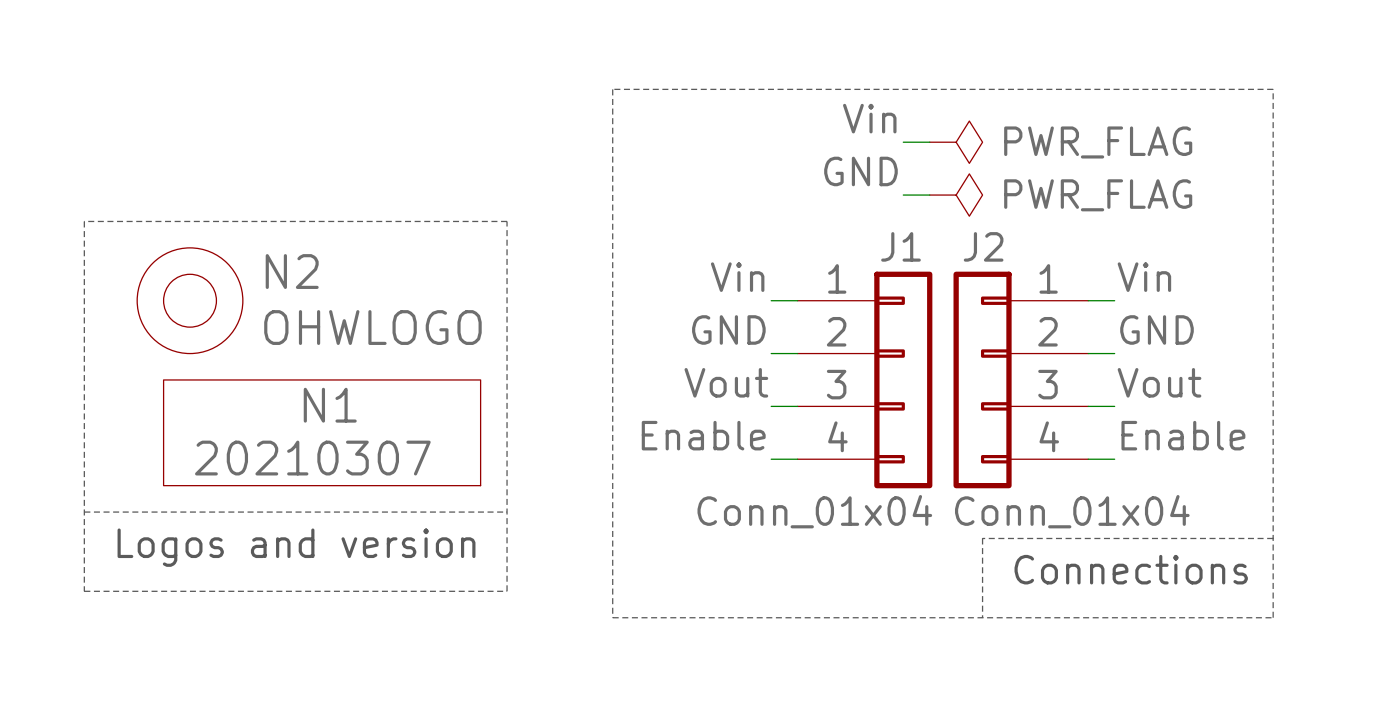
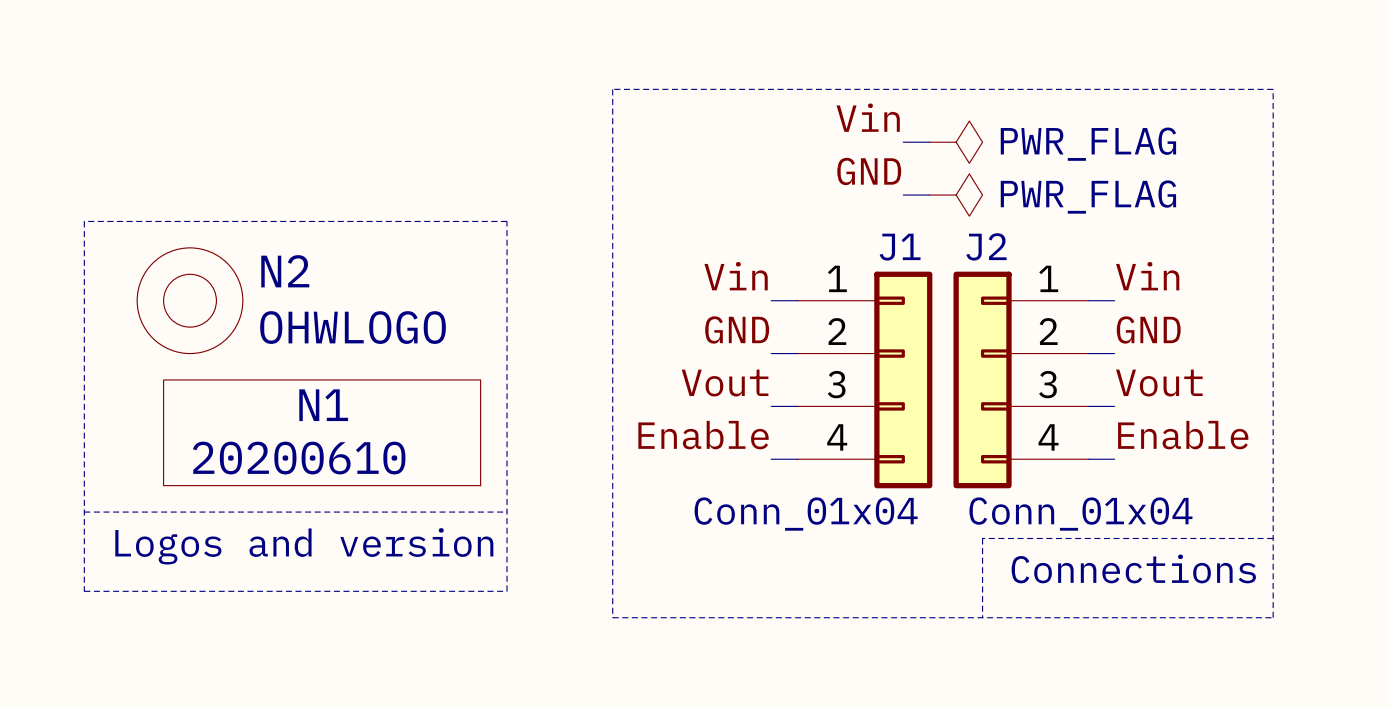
N1 value: 20210307 (312, 458) -> 20200610 (299, 458)

